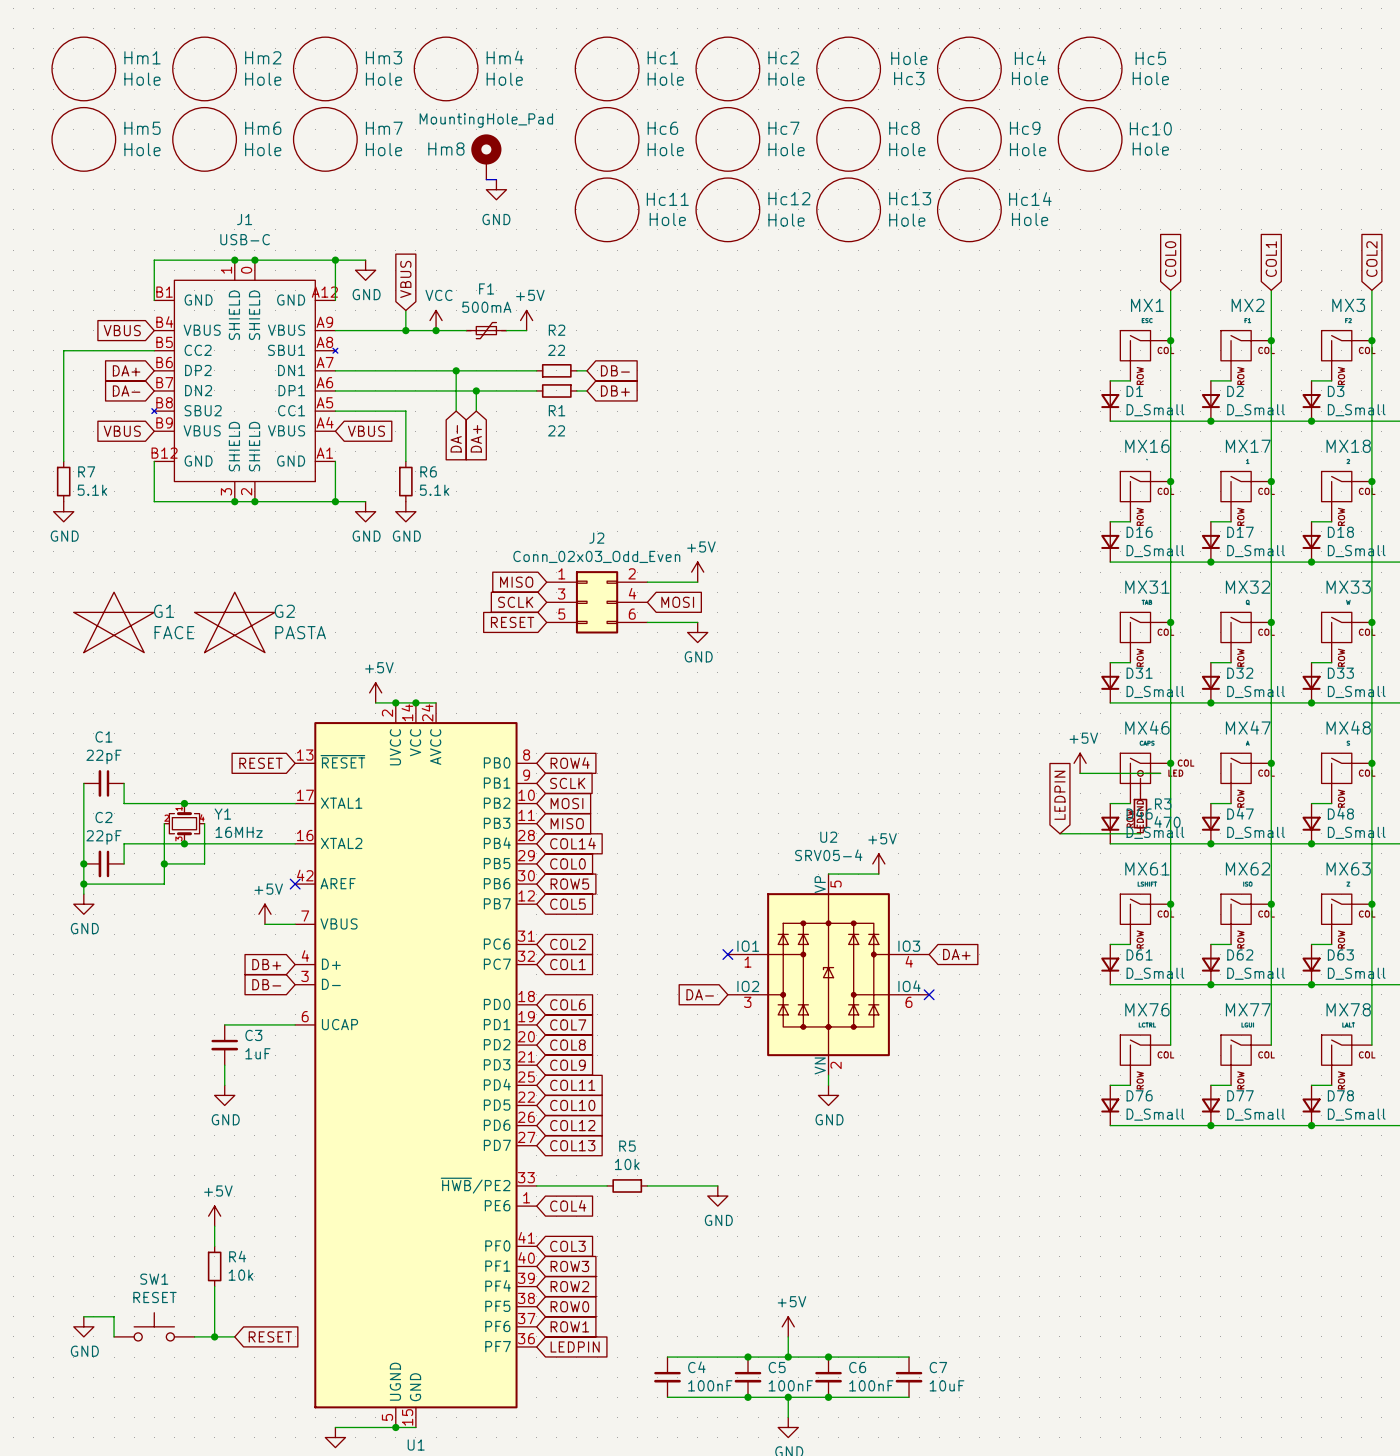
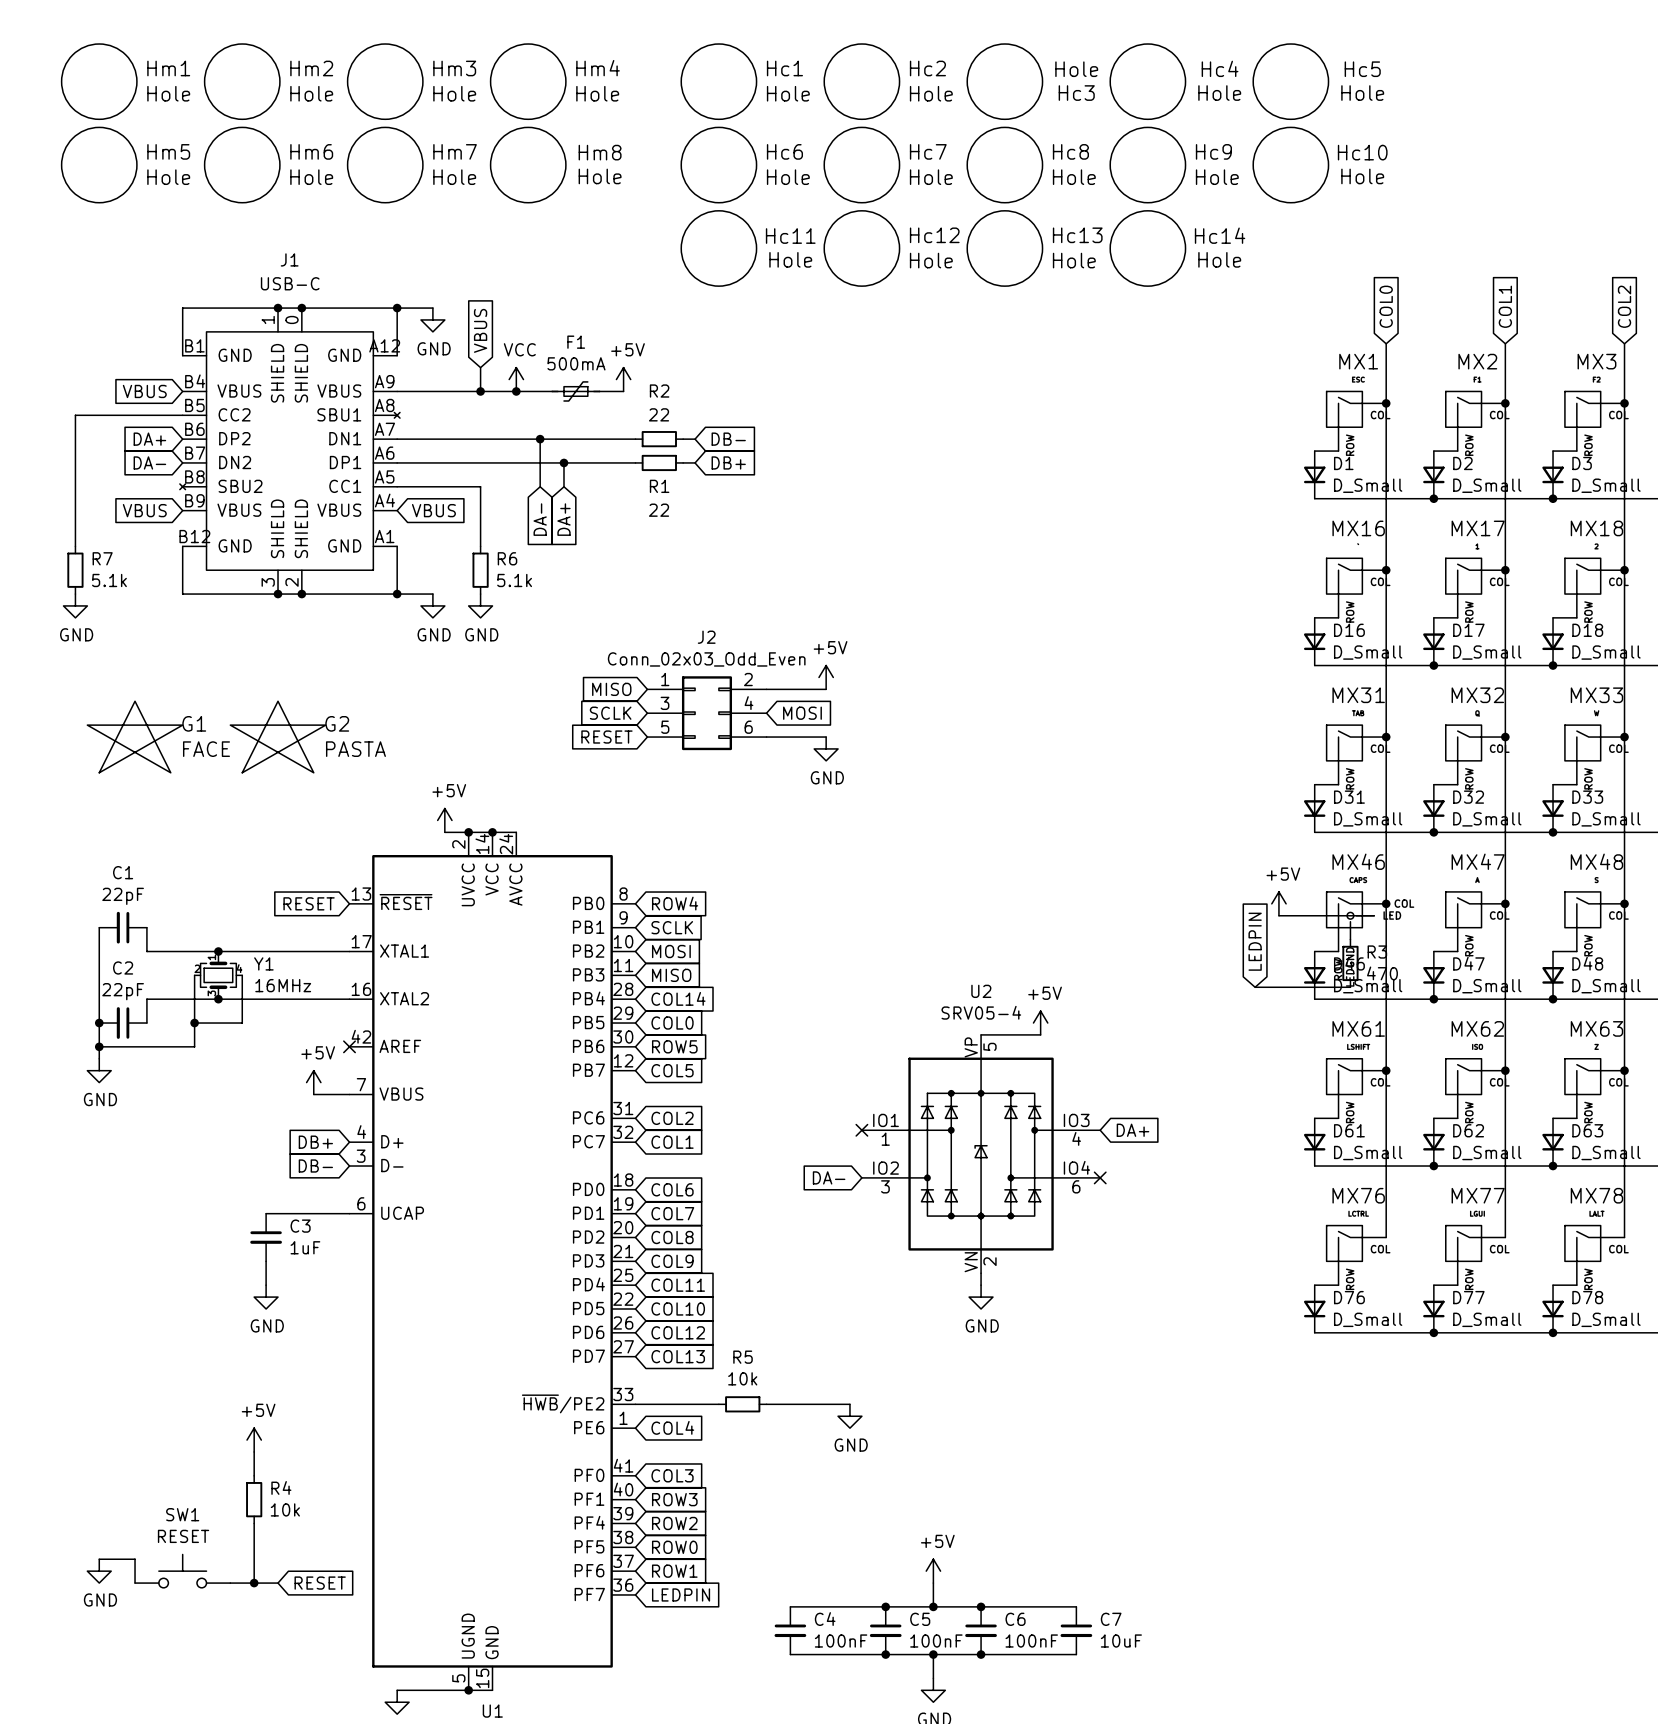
Hm8 value: MountingHole_Pad (486, 120) -> Hole (600, 176)
Hm8 symbol: [471, 134, 502, 180] -> [490, 127, 566, 203]
Hm8 name position: Hm8 (446, 149) -> Hm8 (600, 152)
bus: (486, 179) (496, 179) -> none
power symbol: GND (496, 189) -> none

